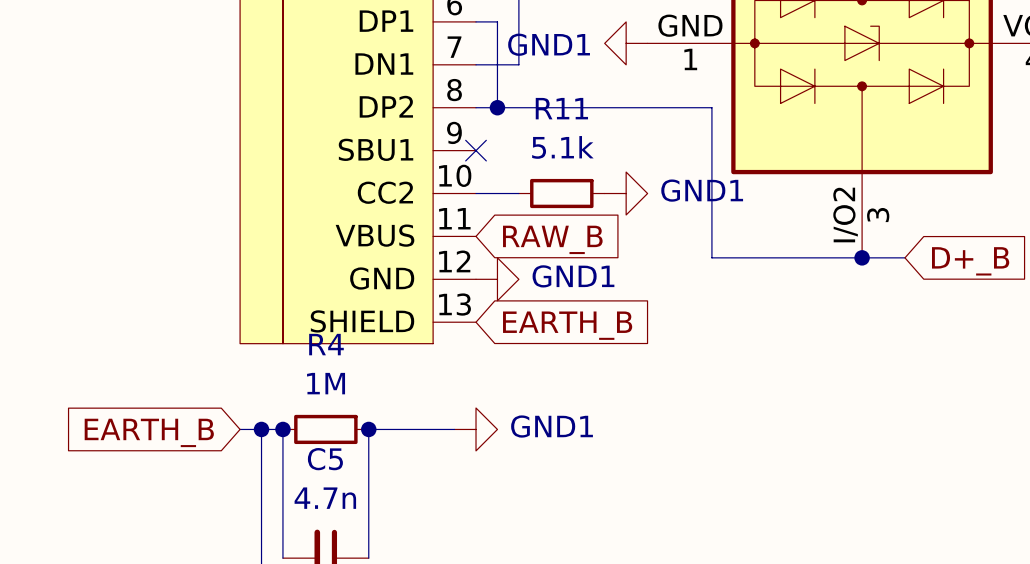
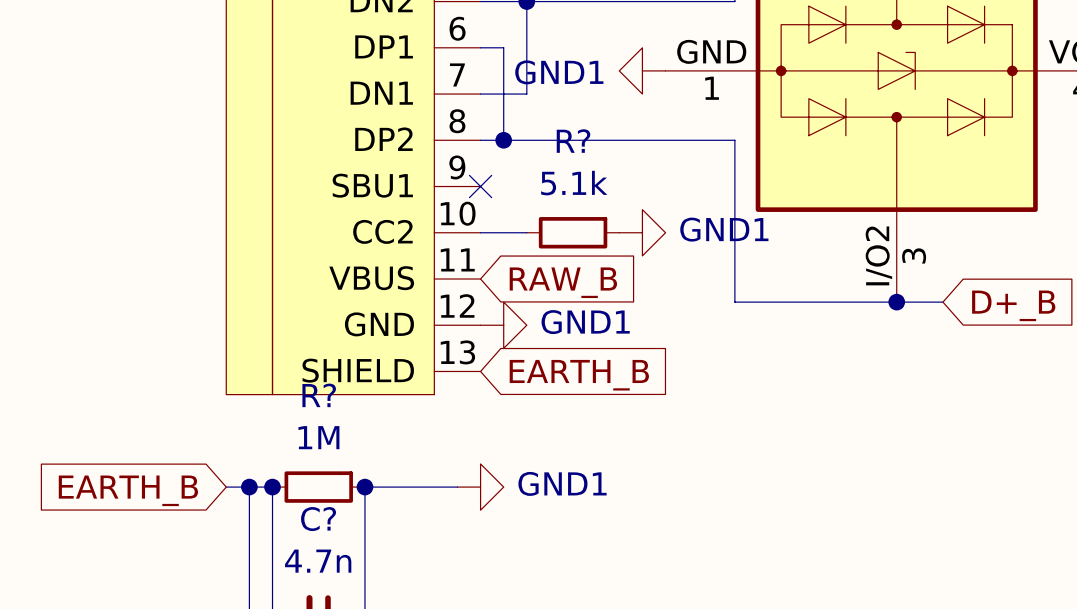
R11 name: R11 (561, 108) -> R? (573, 141)
R4 name: R4 (326, 344) -> R? (319, 395)
C5 name: C5 (325, 459) -> C? (318, 519)

